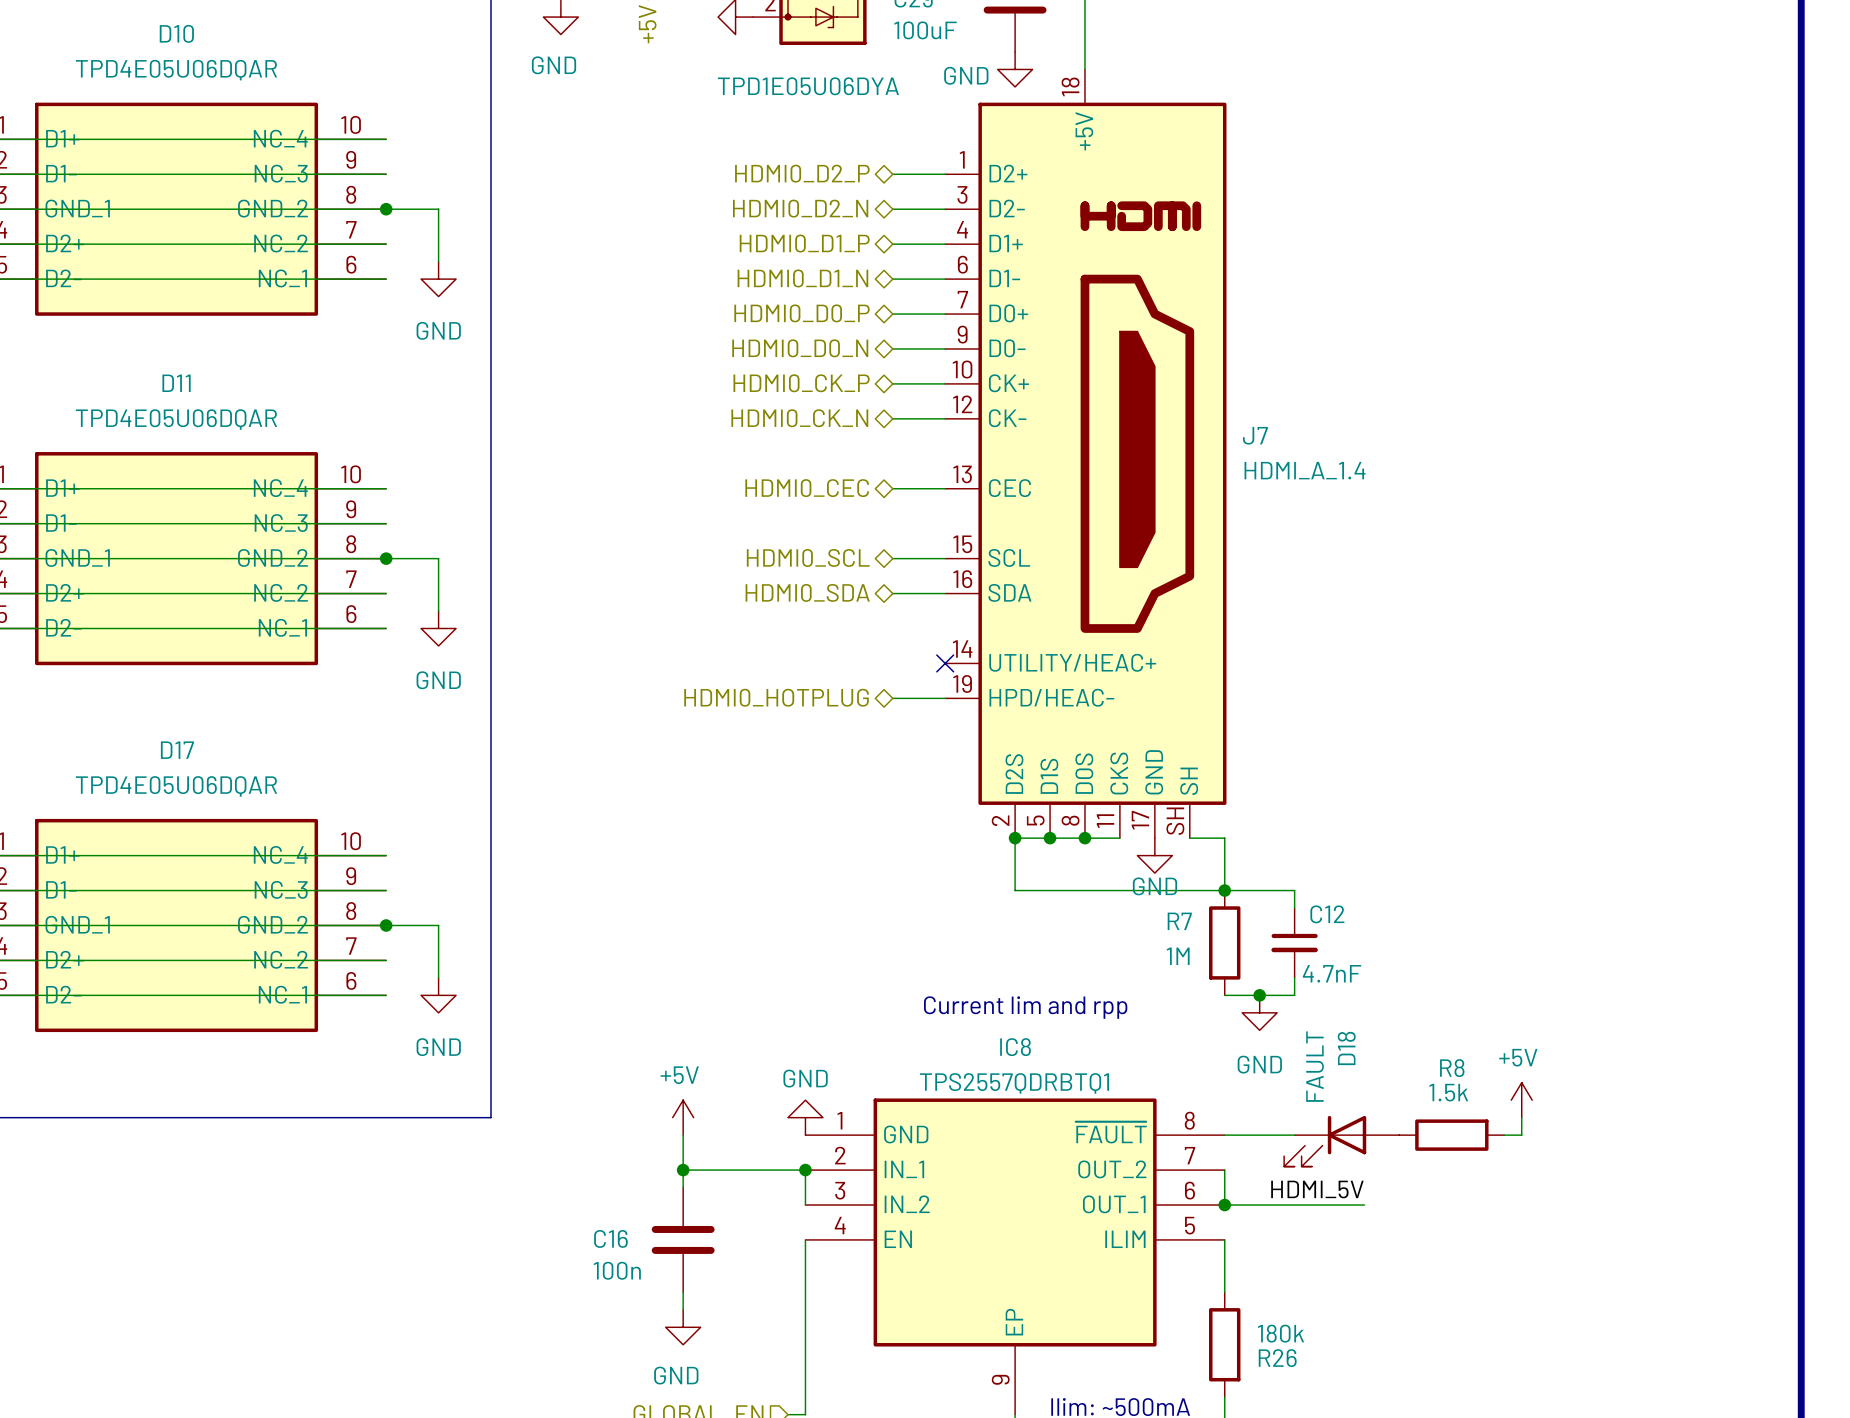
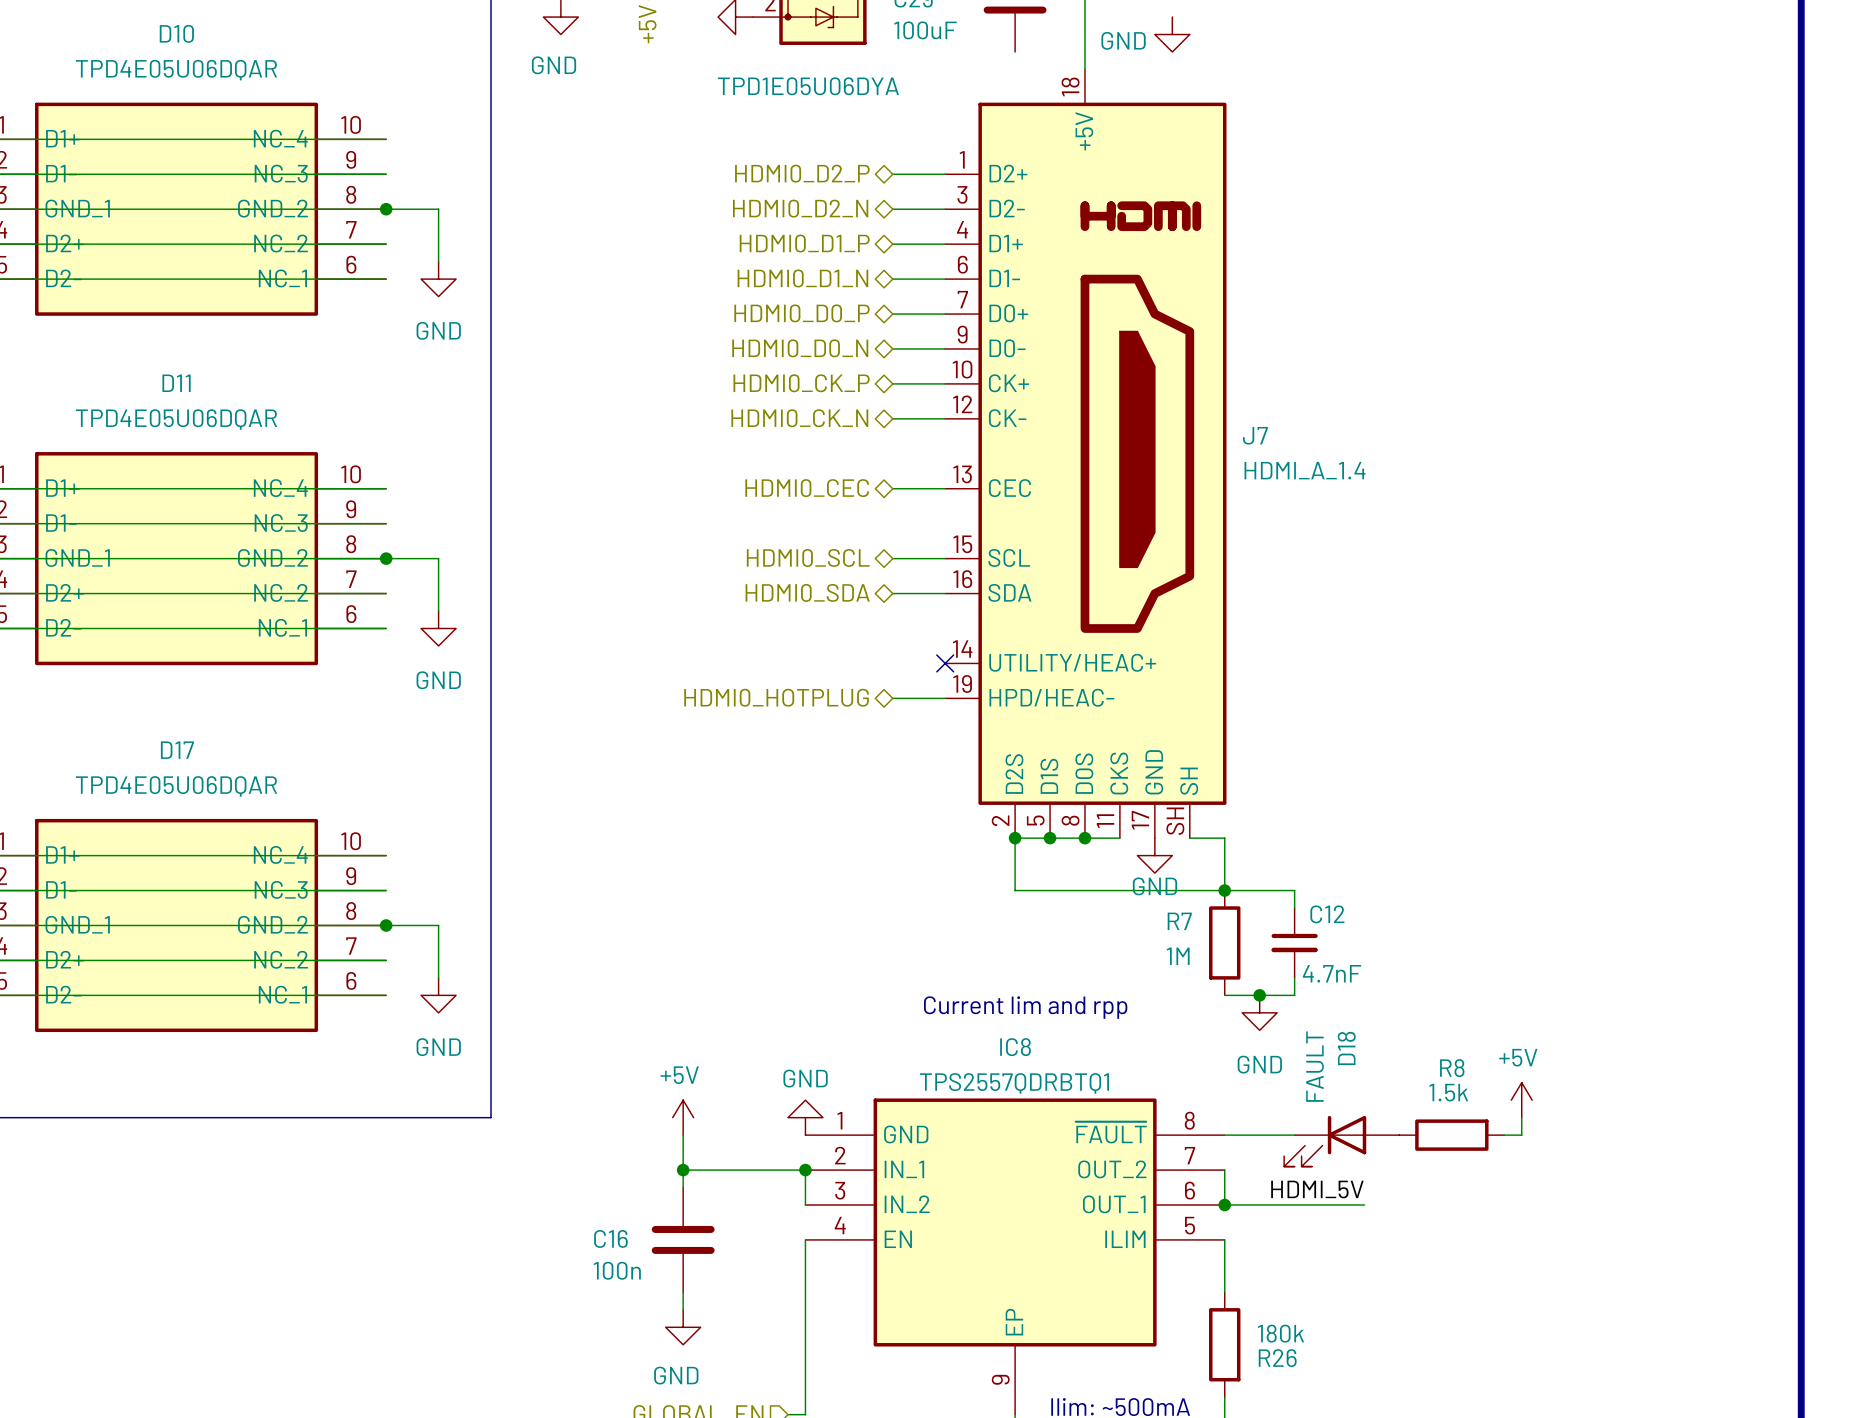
power symbol position: GND (1015, 69) -> GND (1172, 34)

